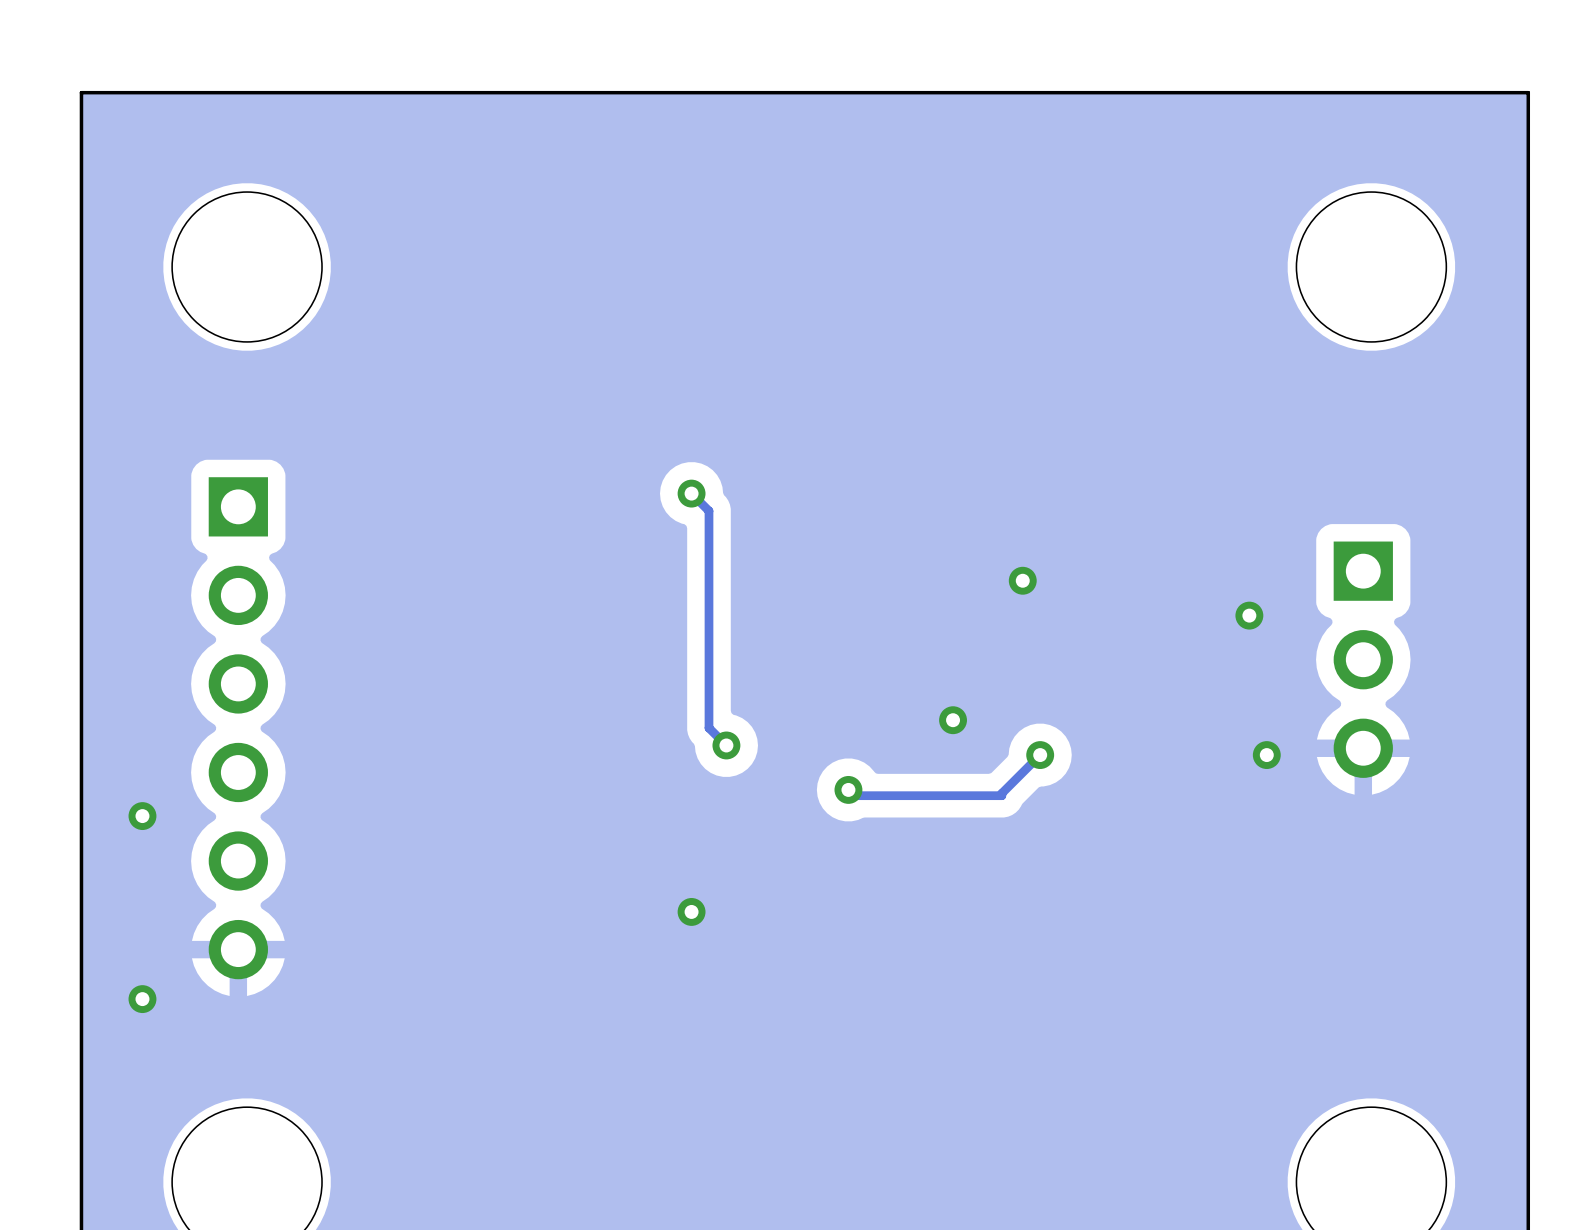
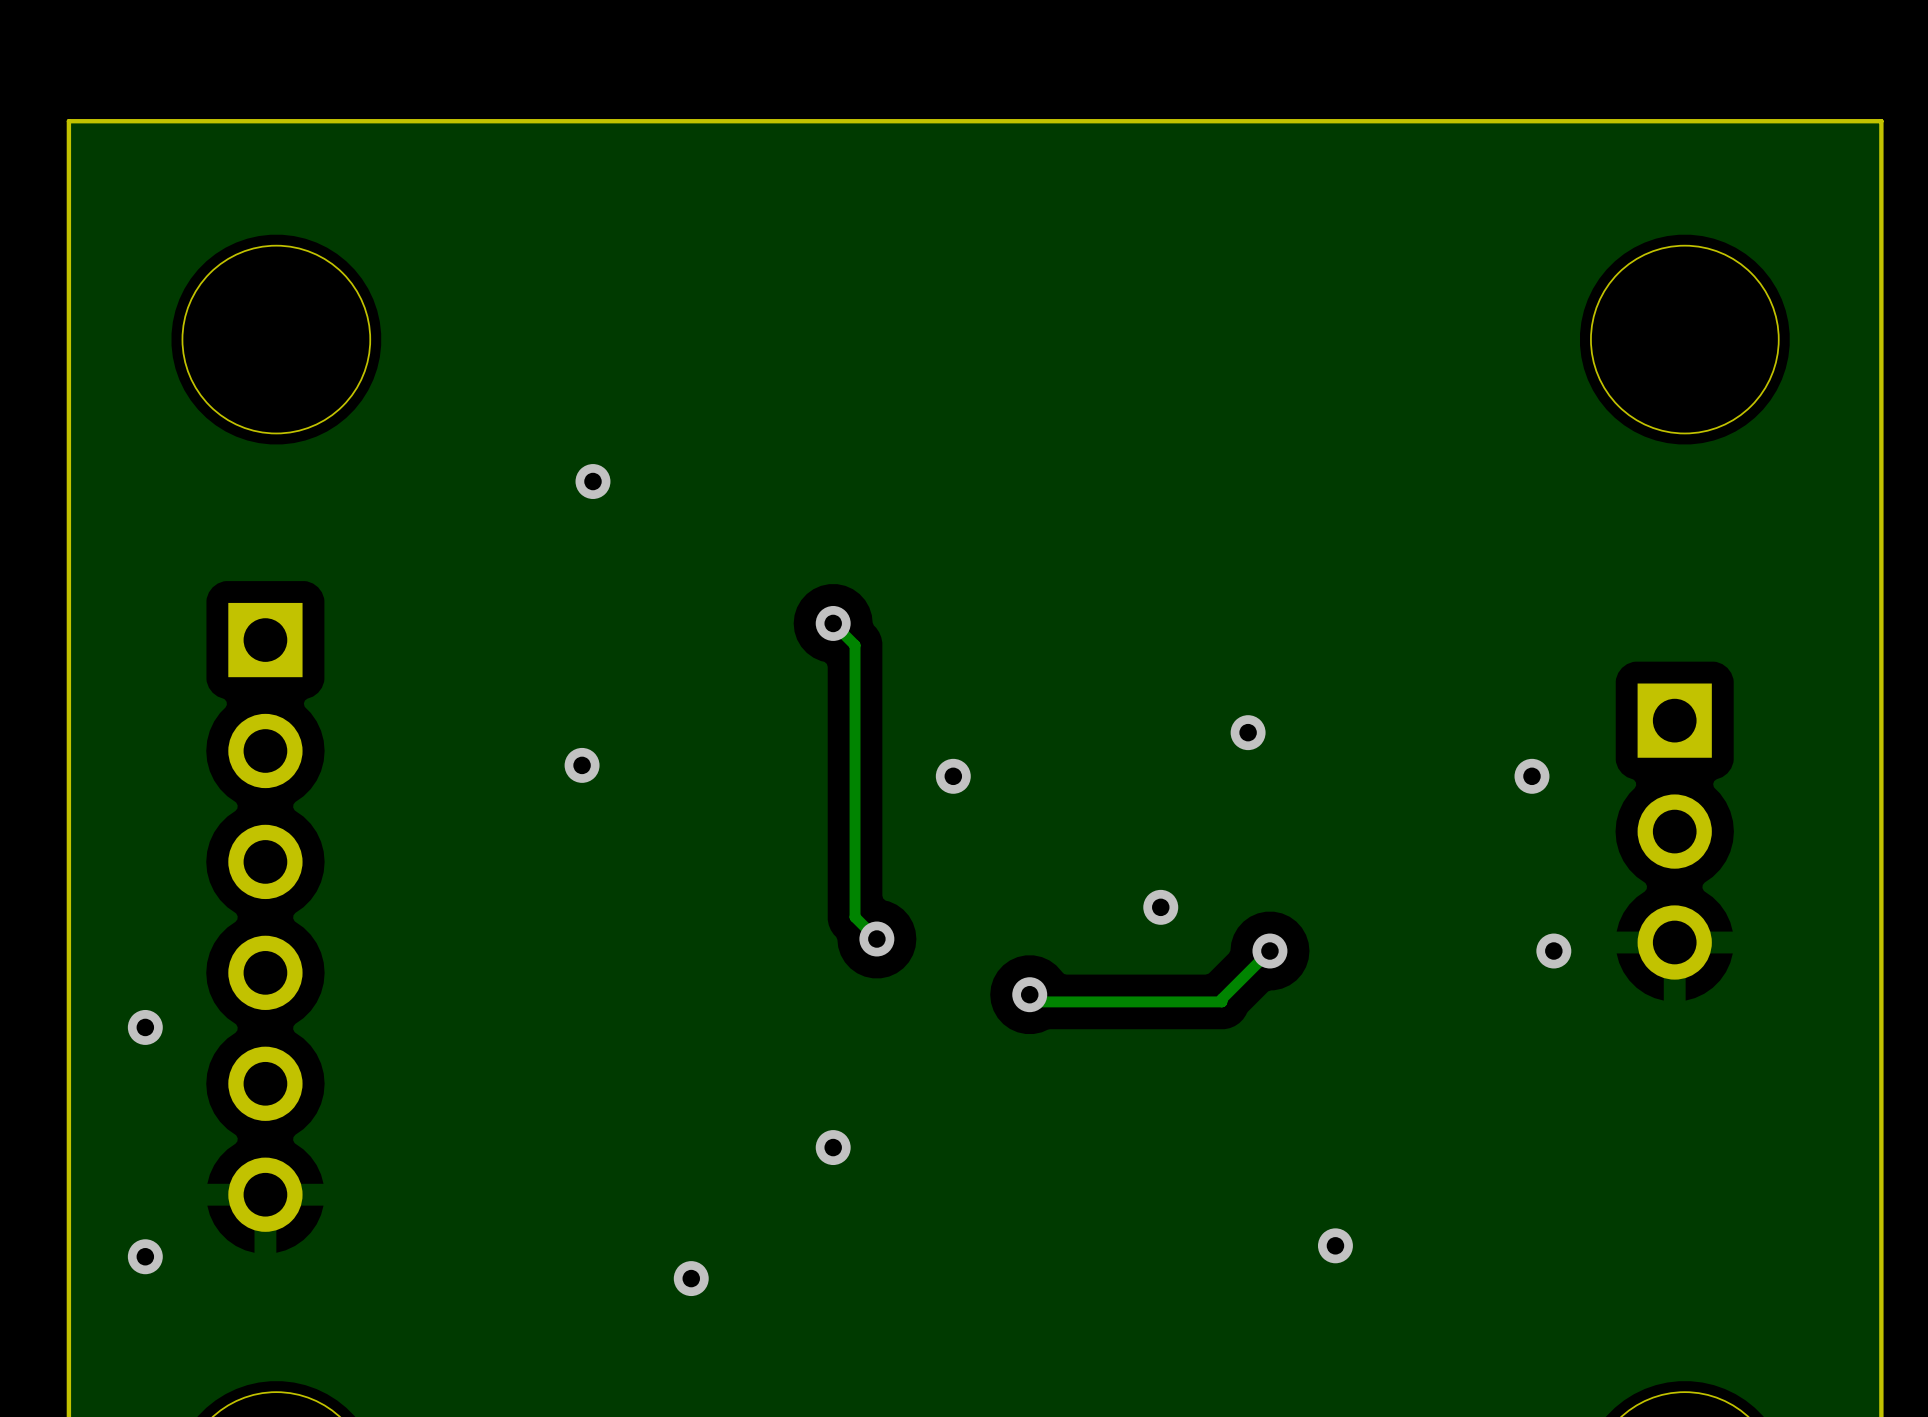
via: none -> (592, 481)
via: none -> (582, 765)
via: none -> (953, 776)
via: none -> (1335, 1245)
via: none -> (691, 1278)

